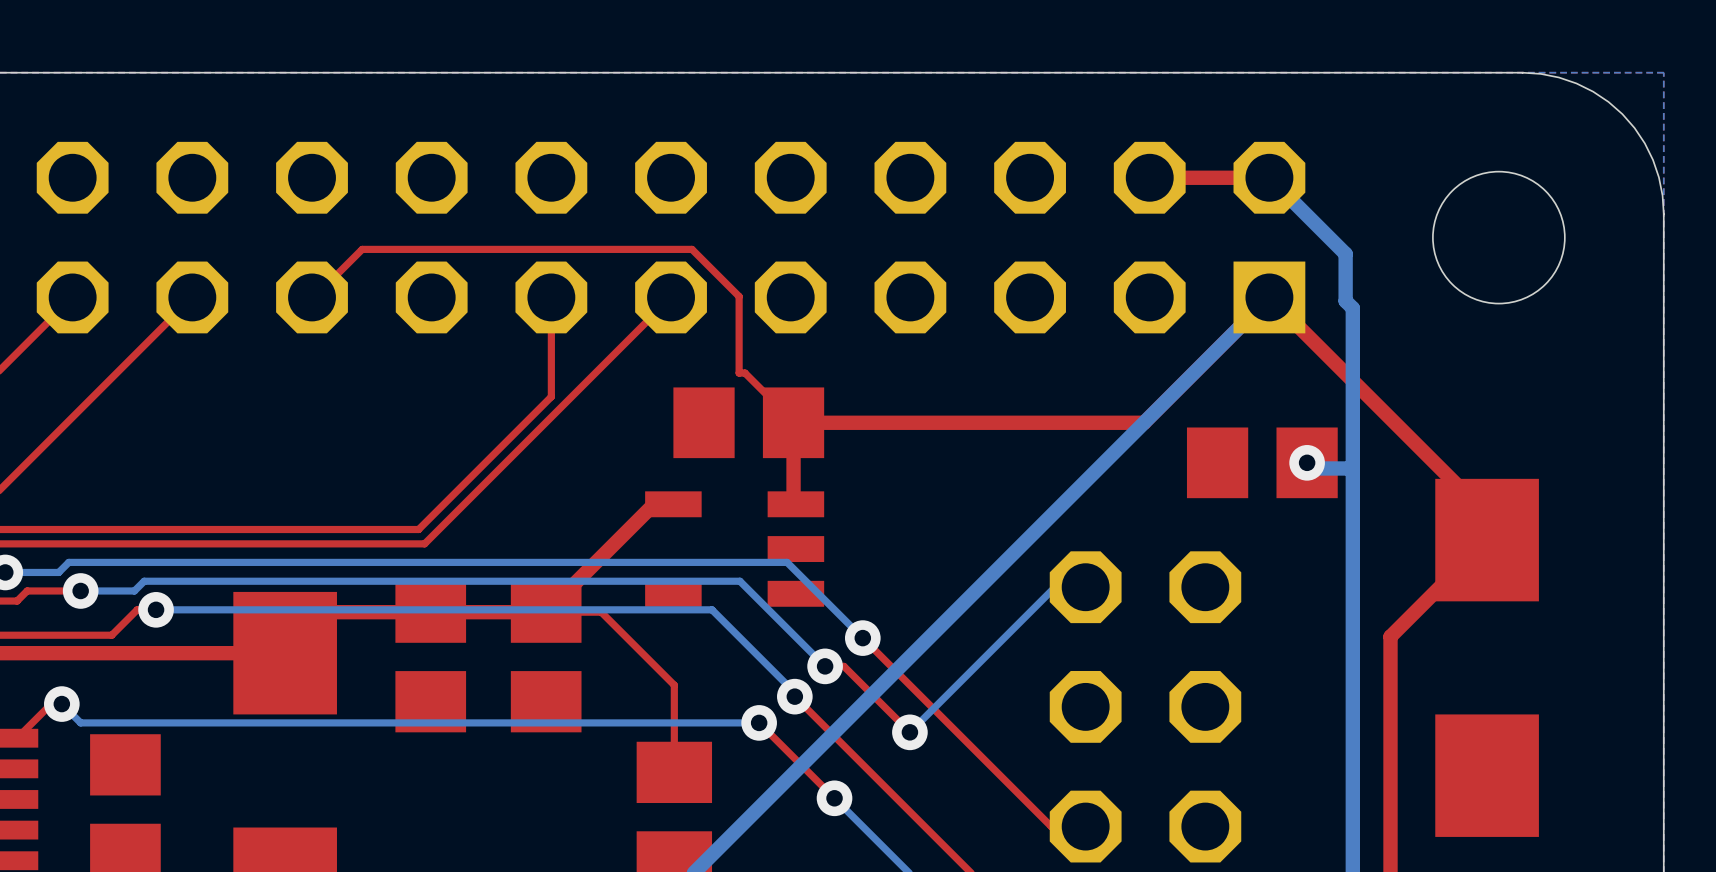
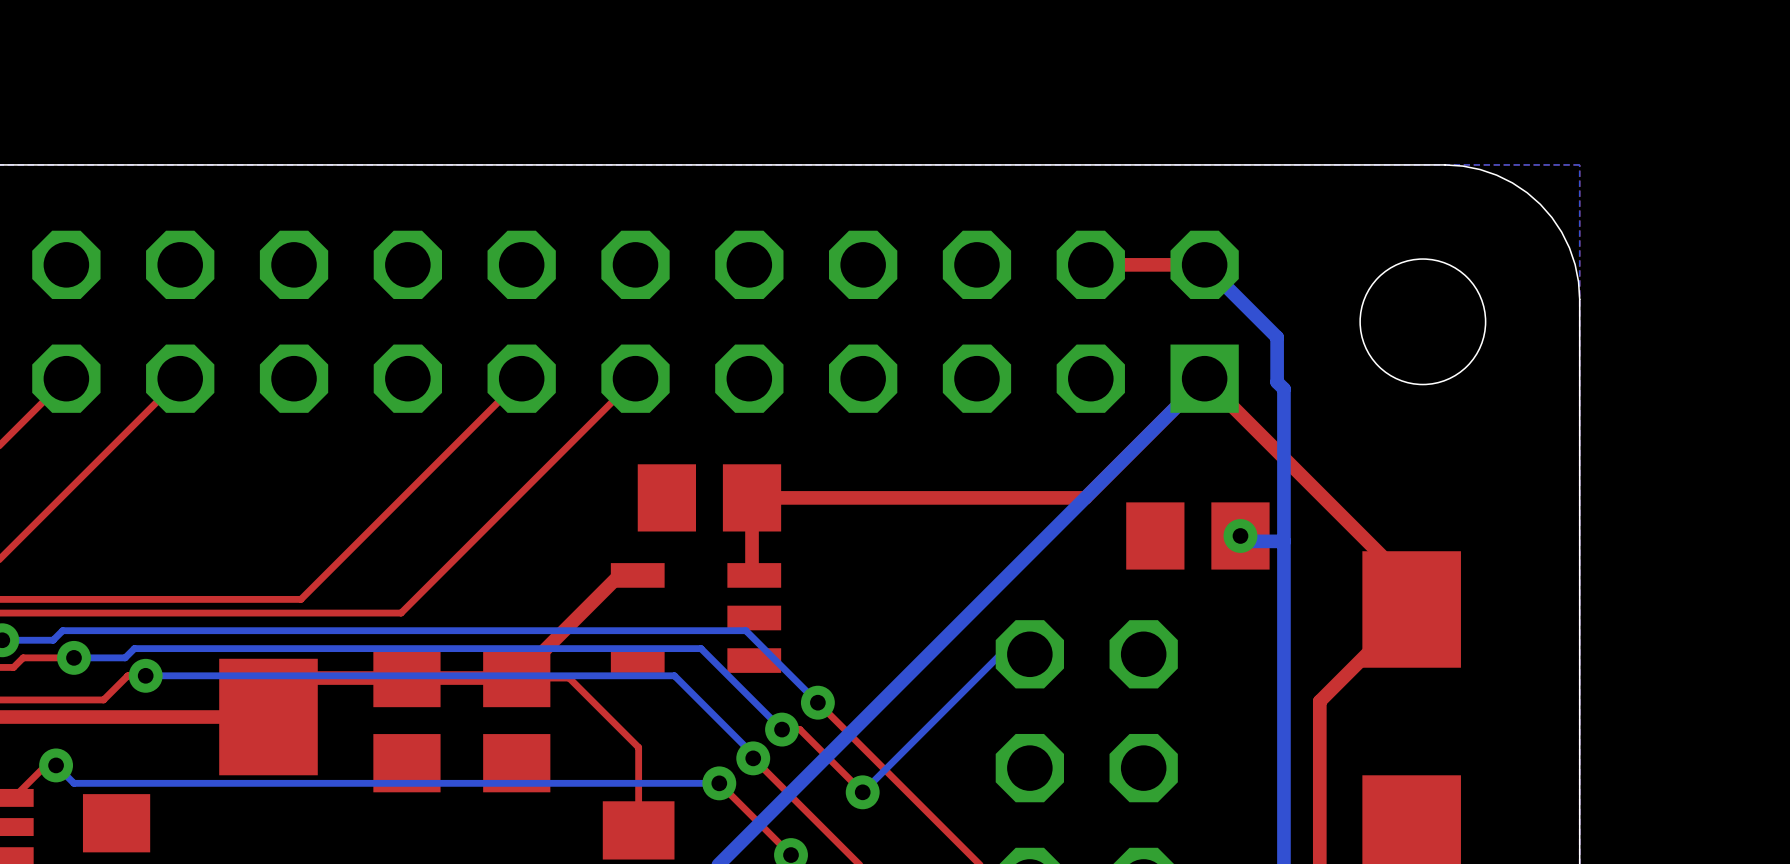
top track: (312, 297) (362, 249) (692, 249) (739, 296) (739, 373) (745, 373) (793, 422) -> none
top track: (551, 297) (551, 396) (418, 529) (319, 529) -> (521, 378) (300, 599)

